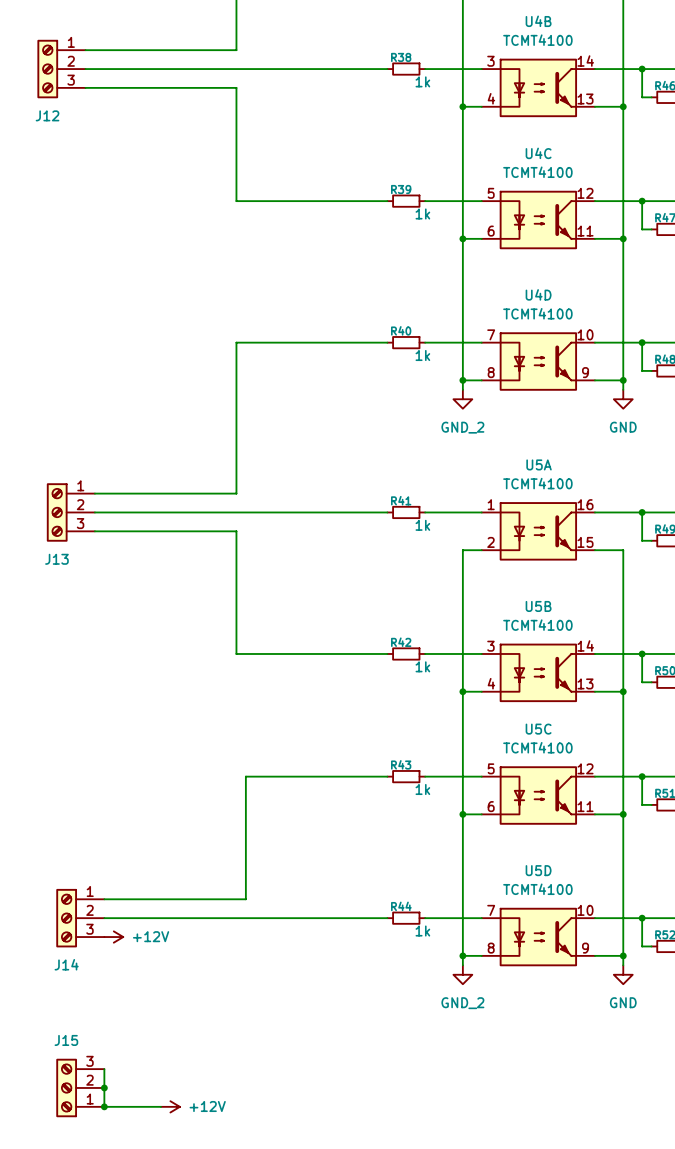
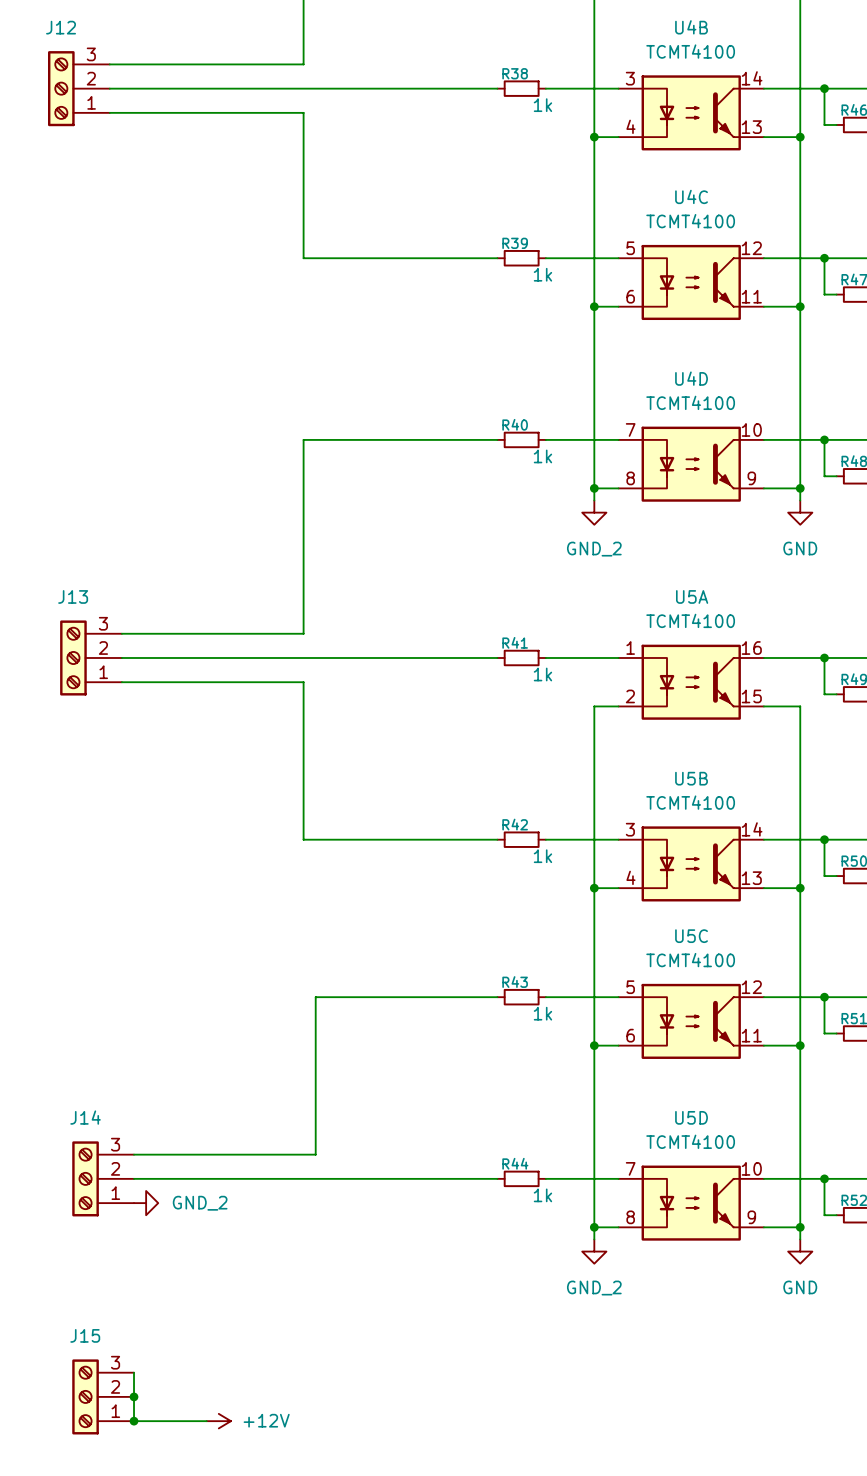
J12 flip: as is (47, 69) -> up-down (61, 88)
J13 flip: as is (57, 512) -> up-down (73, 657)
J14 flip: as is (66, 918) -> up-down (85, 1178)
power symbol: +12V (113, 937) -> GND_2 (146, 1203)

